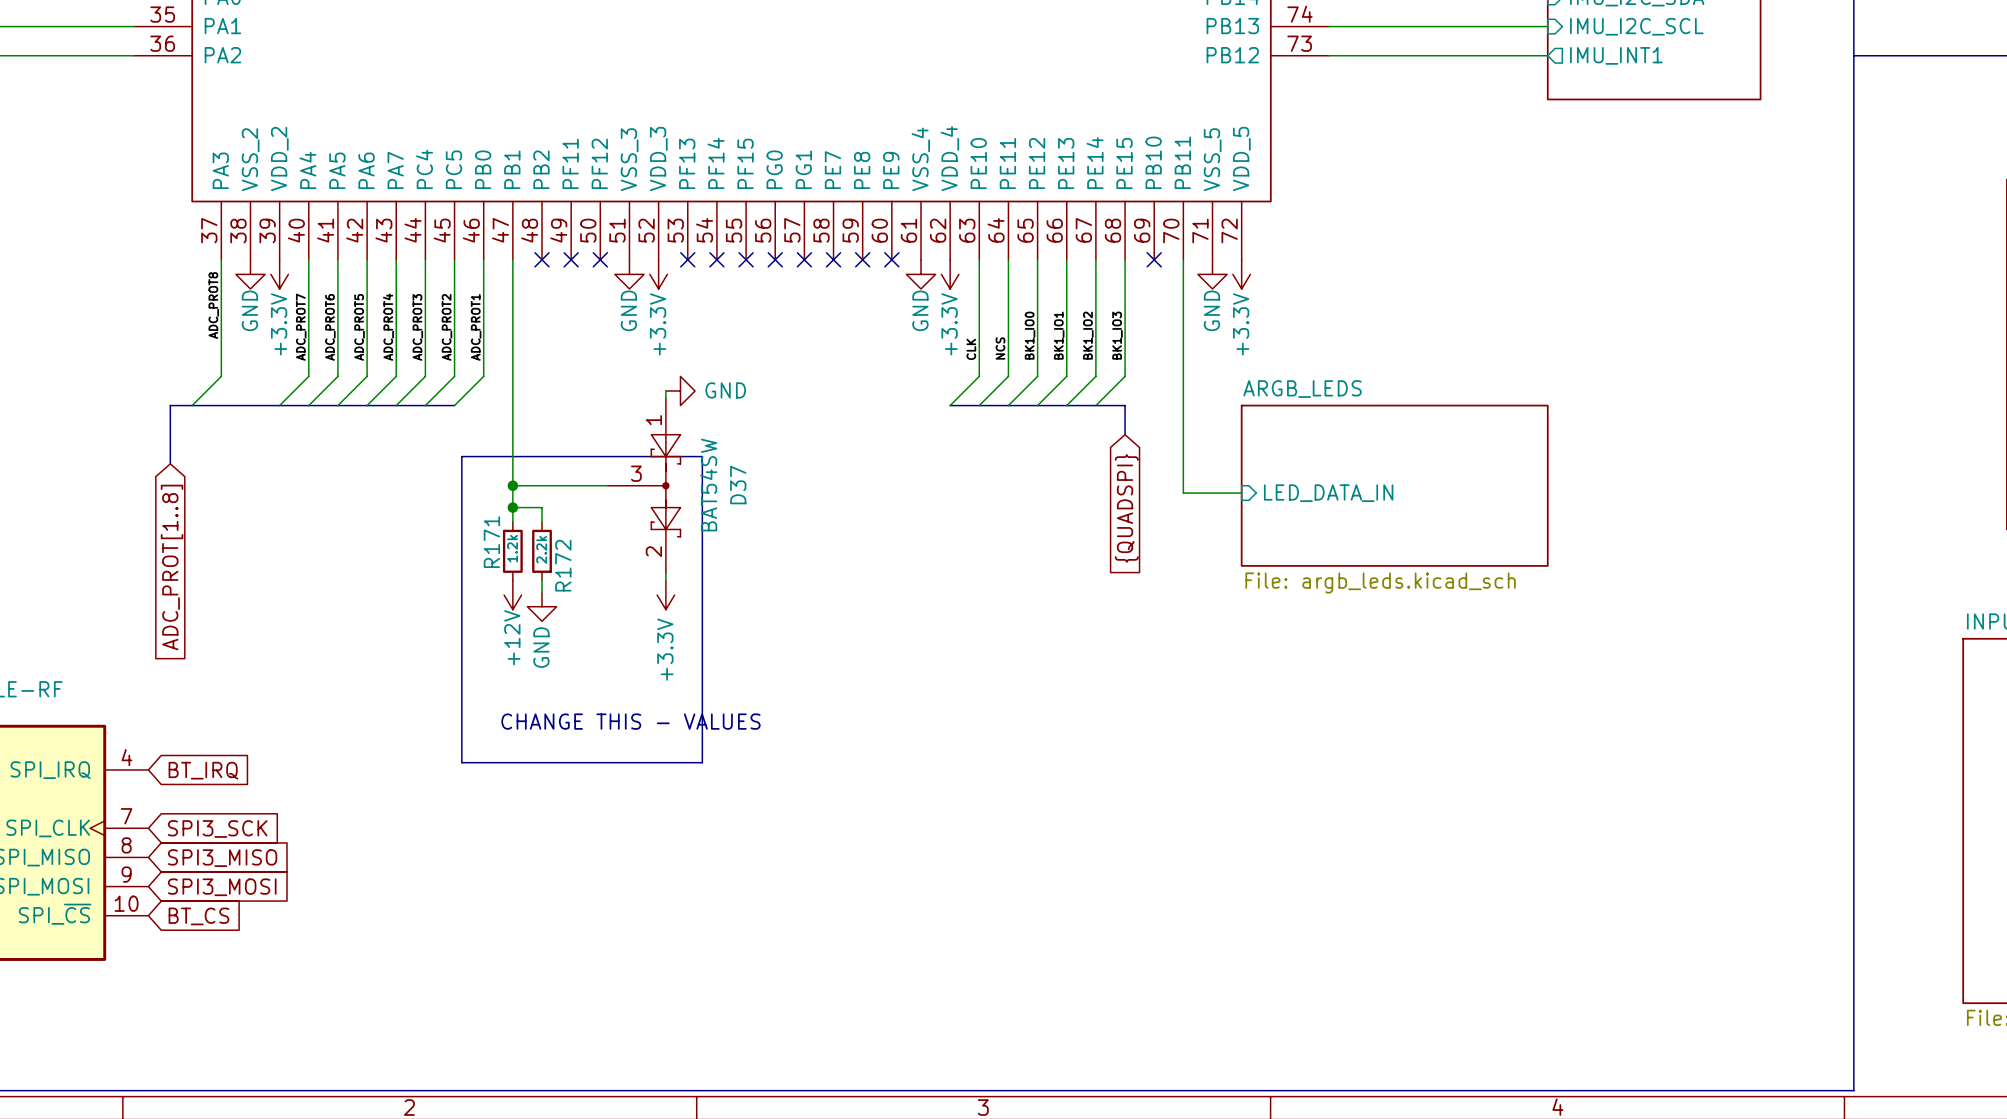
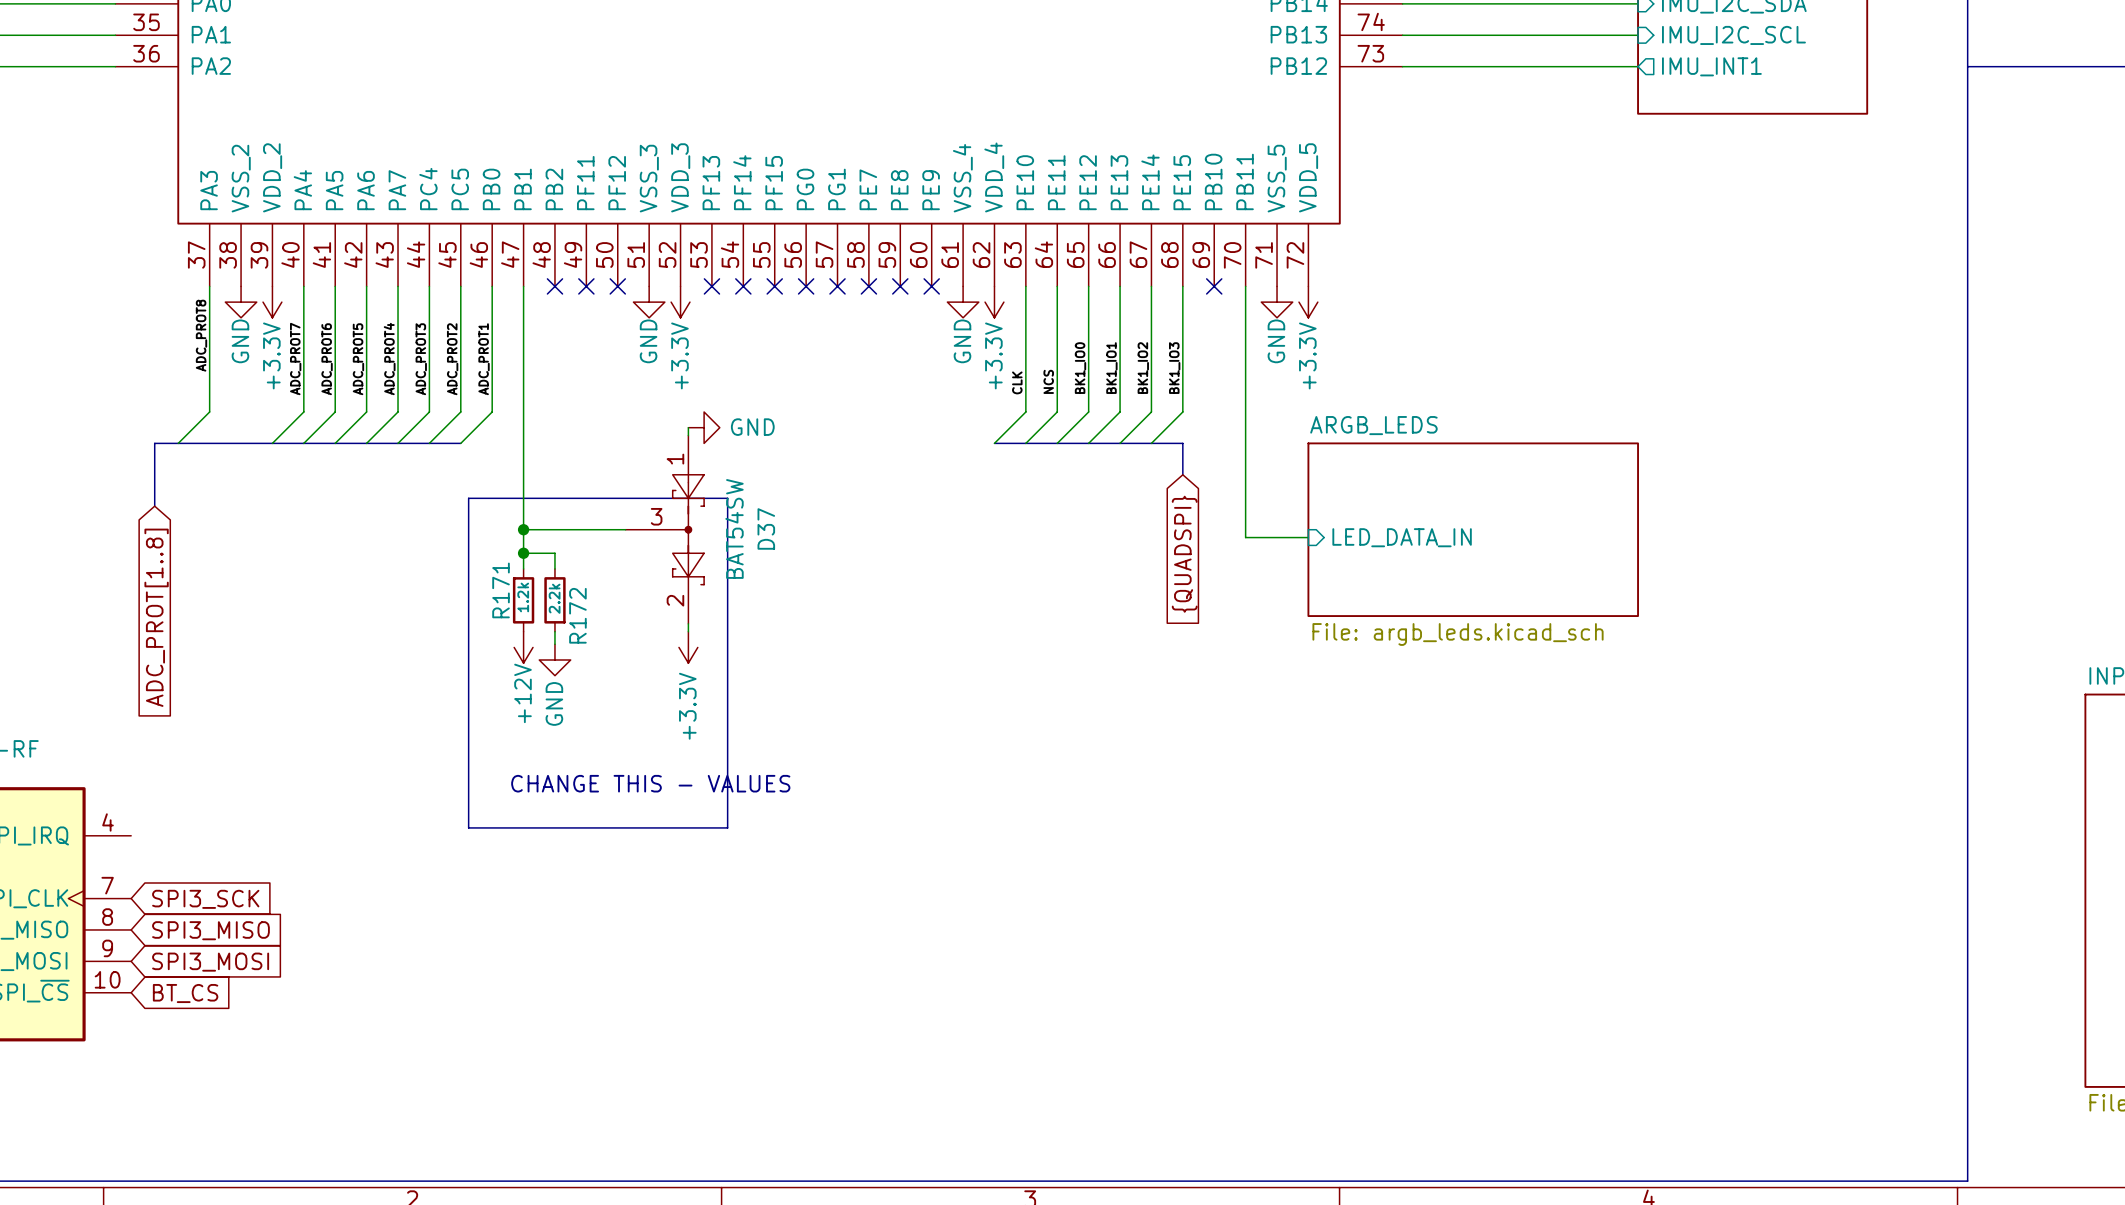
global label: BT_IRQ (203, 770) -> none

